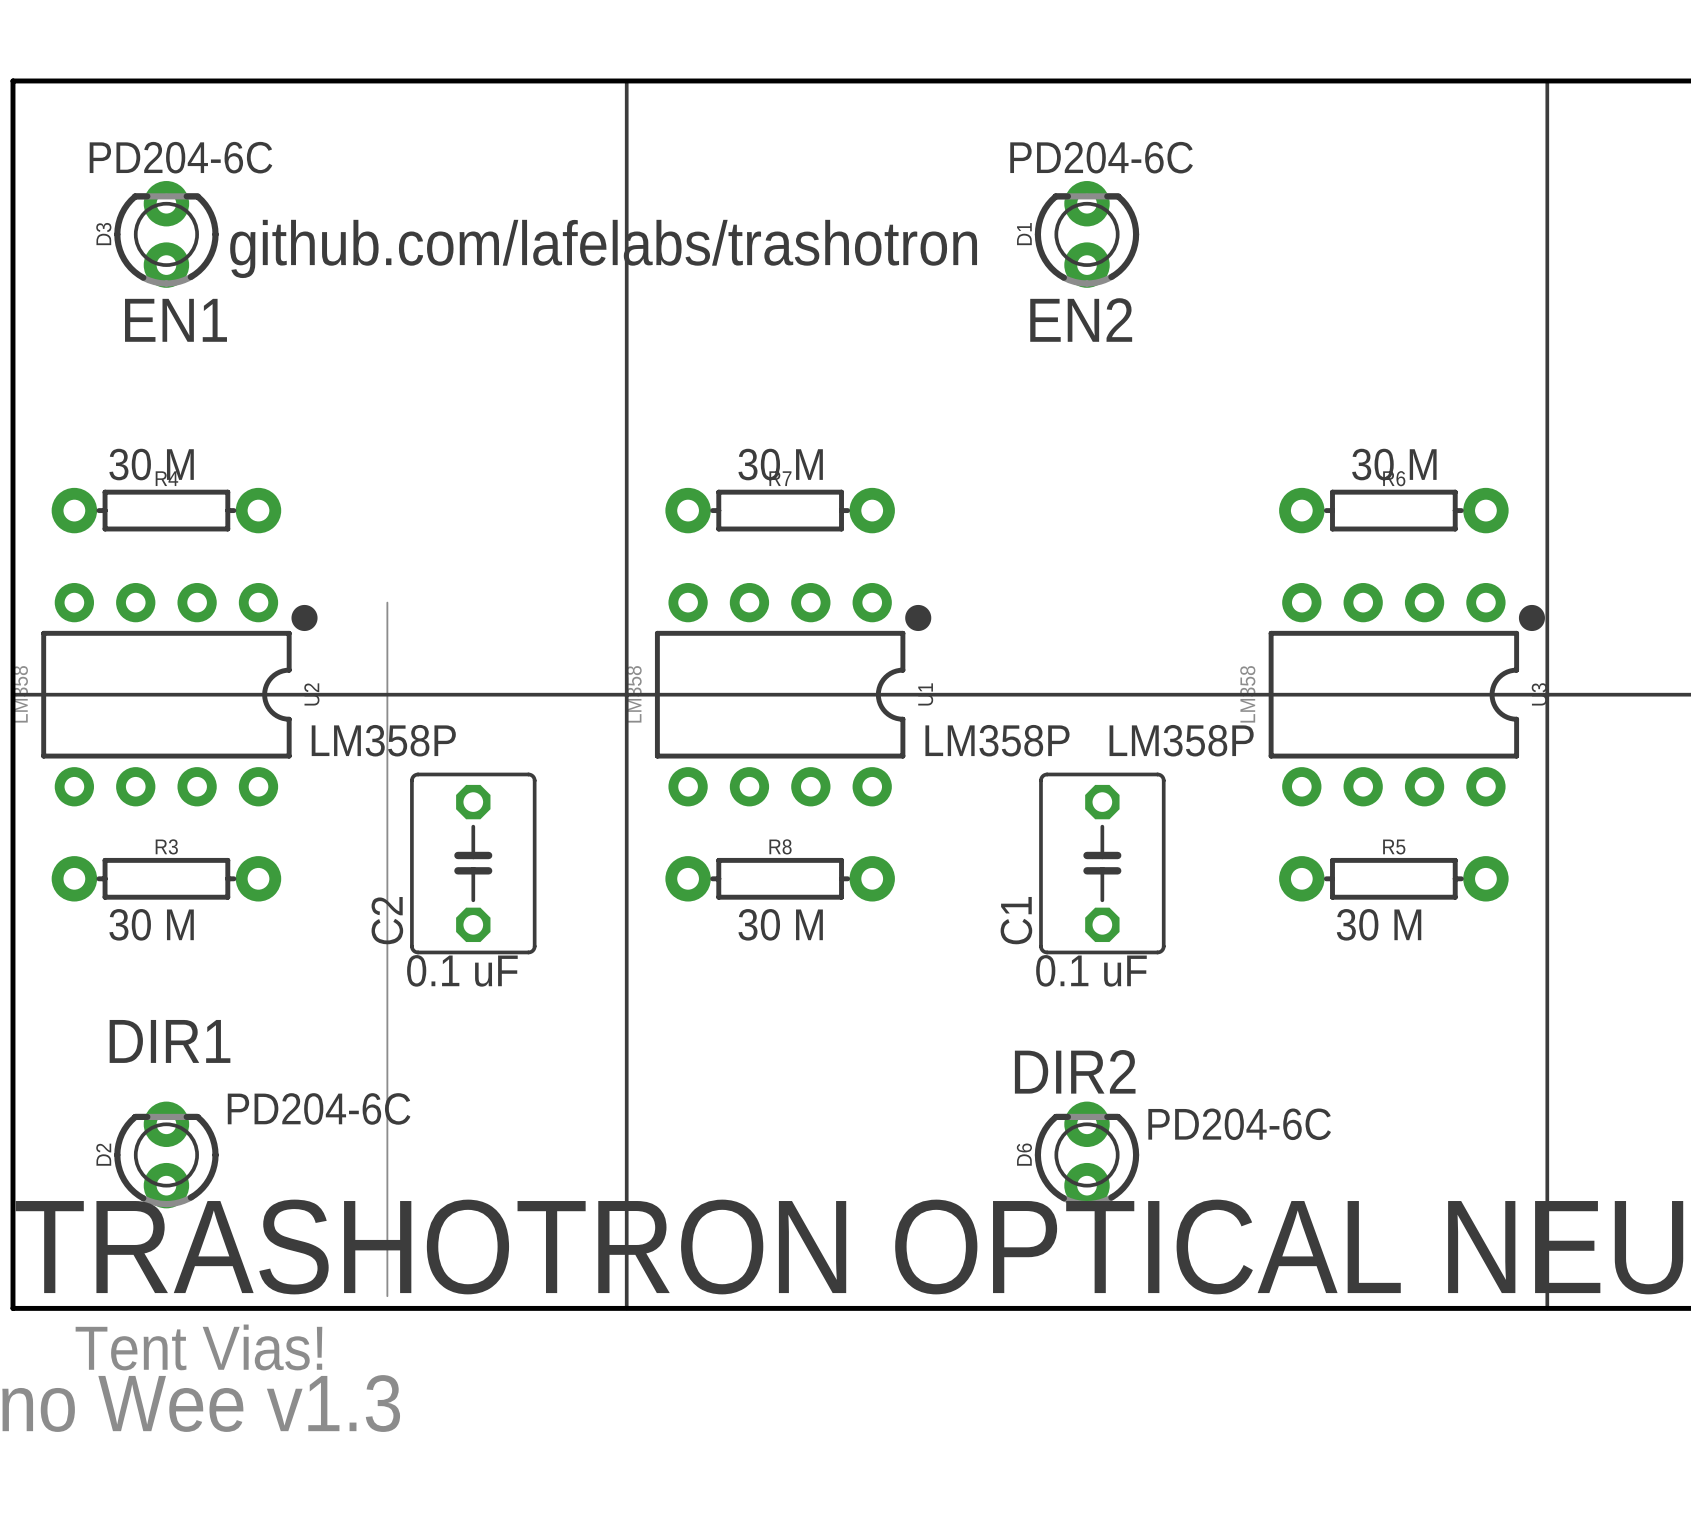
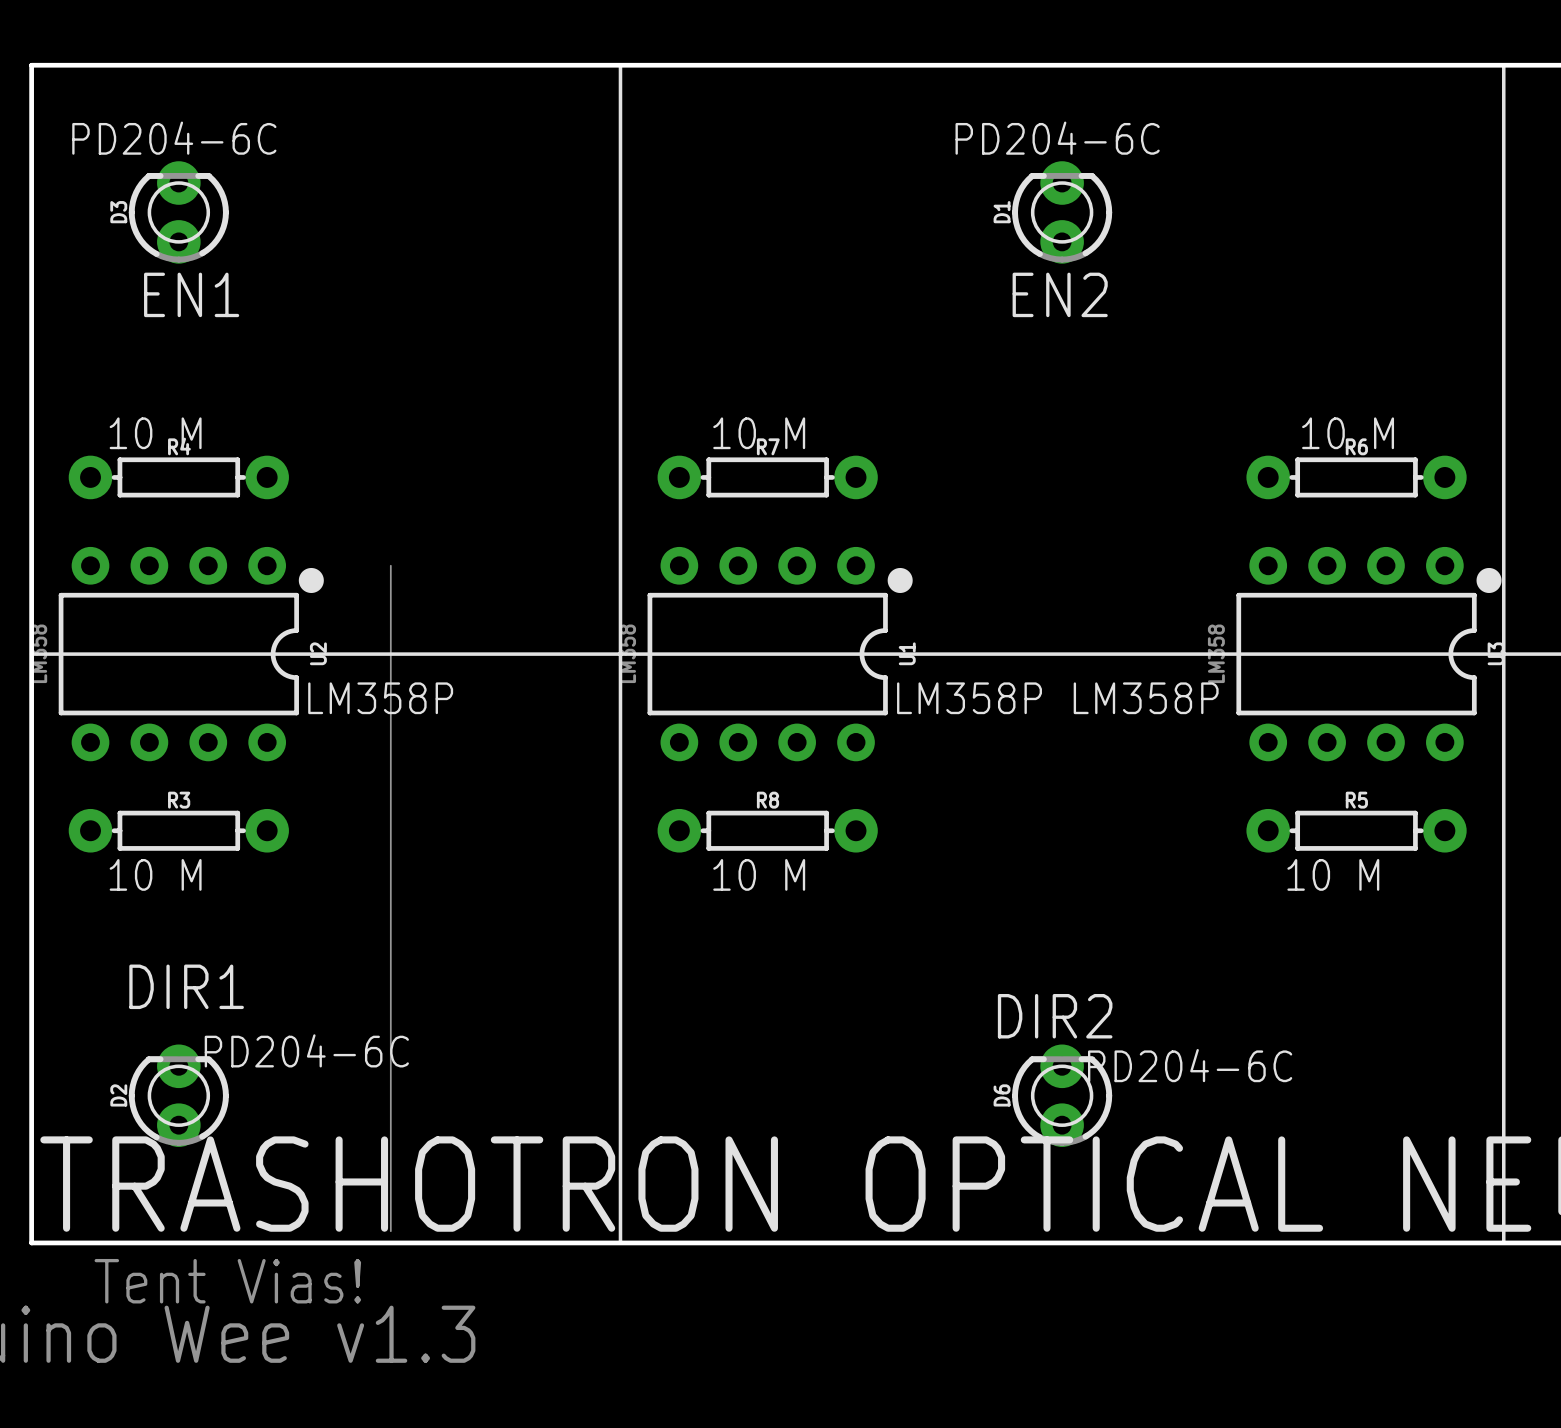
text: github.com/lafelabs/trashotron (603, 248) -> none
text: 30 M (151, 464) -> 10 M (155, 433)
text: 30 M (780, 464) -> 10 M (759, 433)
text: 30 M (1394, 464) -> 10 M (1348, 433)
C2: (473, 863) -> none
C1: (1102, 863) -> none
text: 30 M (151, 924) -> 10 M (155, 874)
text: 30 M (780, 924) -> 10 M (759, 874)
text: 30 M (1379, 924) -> 10 M (1333, 874)
text: 0.1 uF (462, 970) -> none
text: 0.1 uF (1091, 970) -> none

